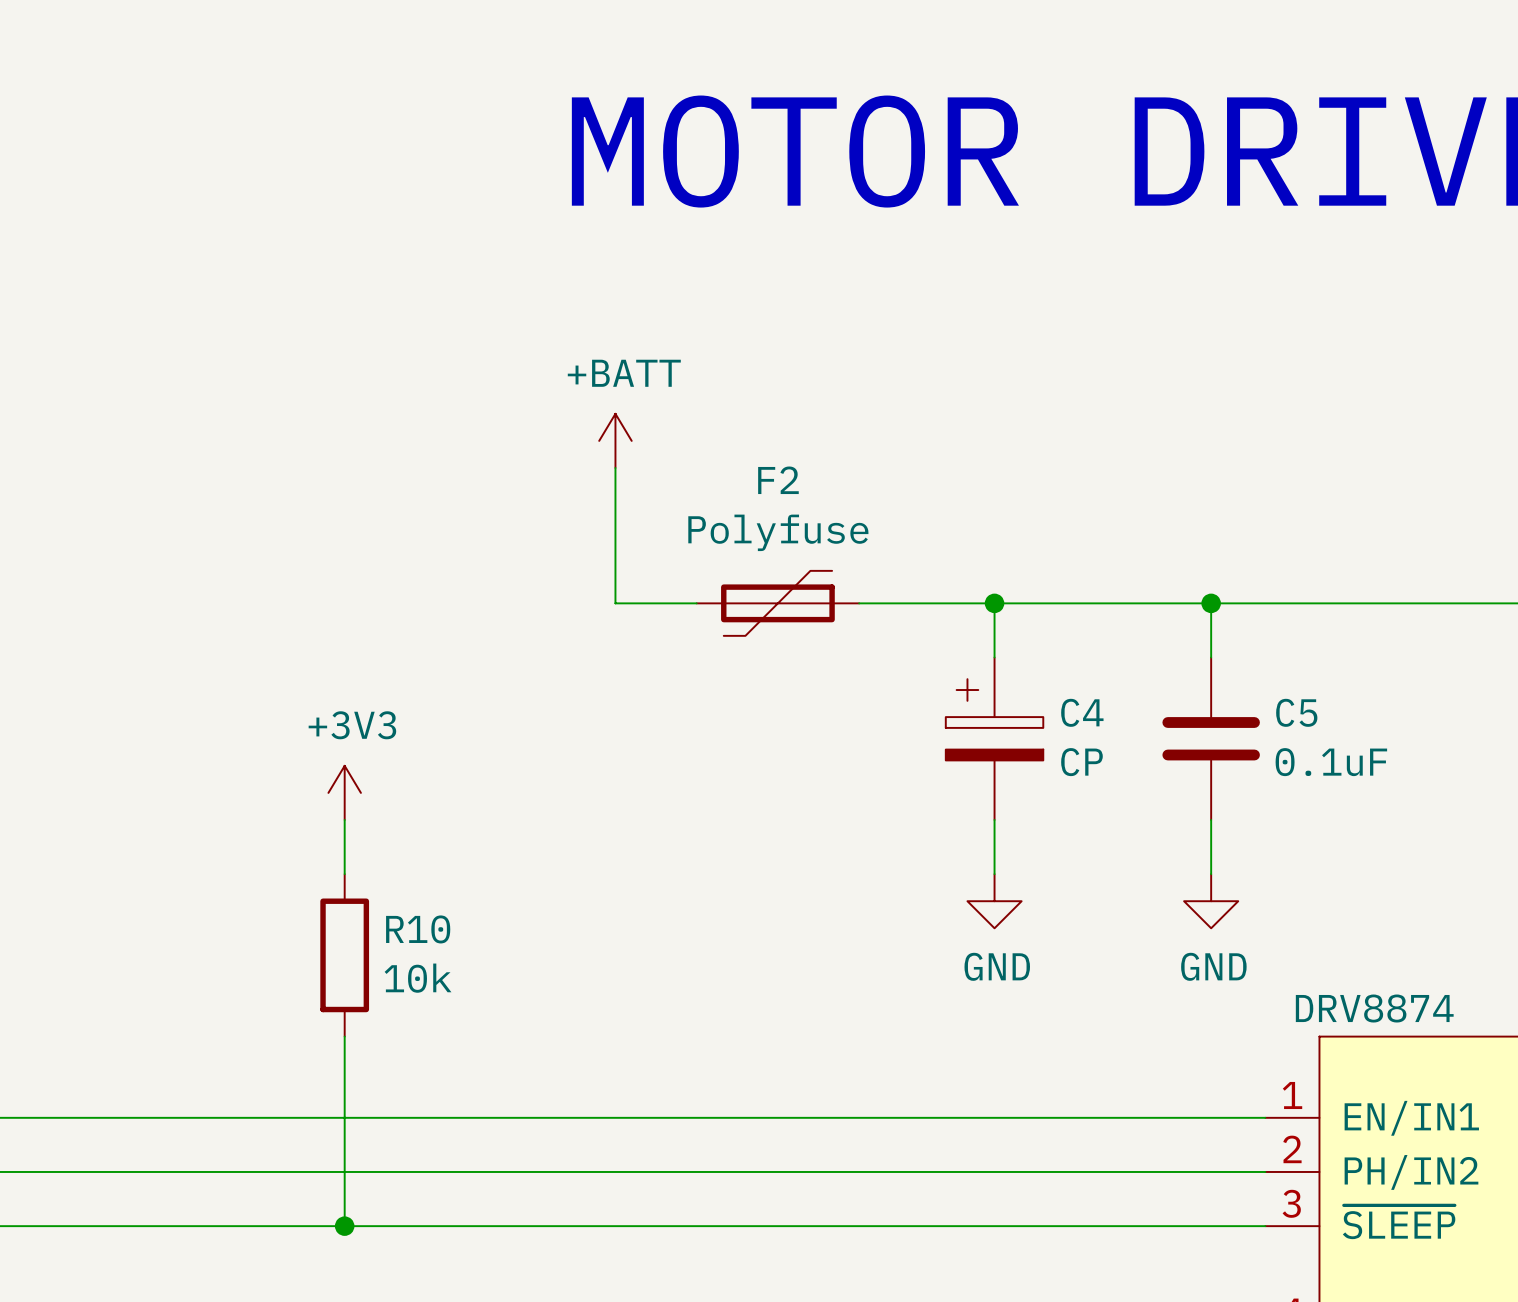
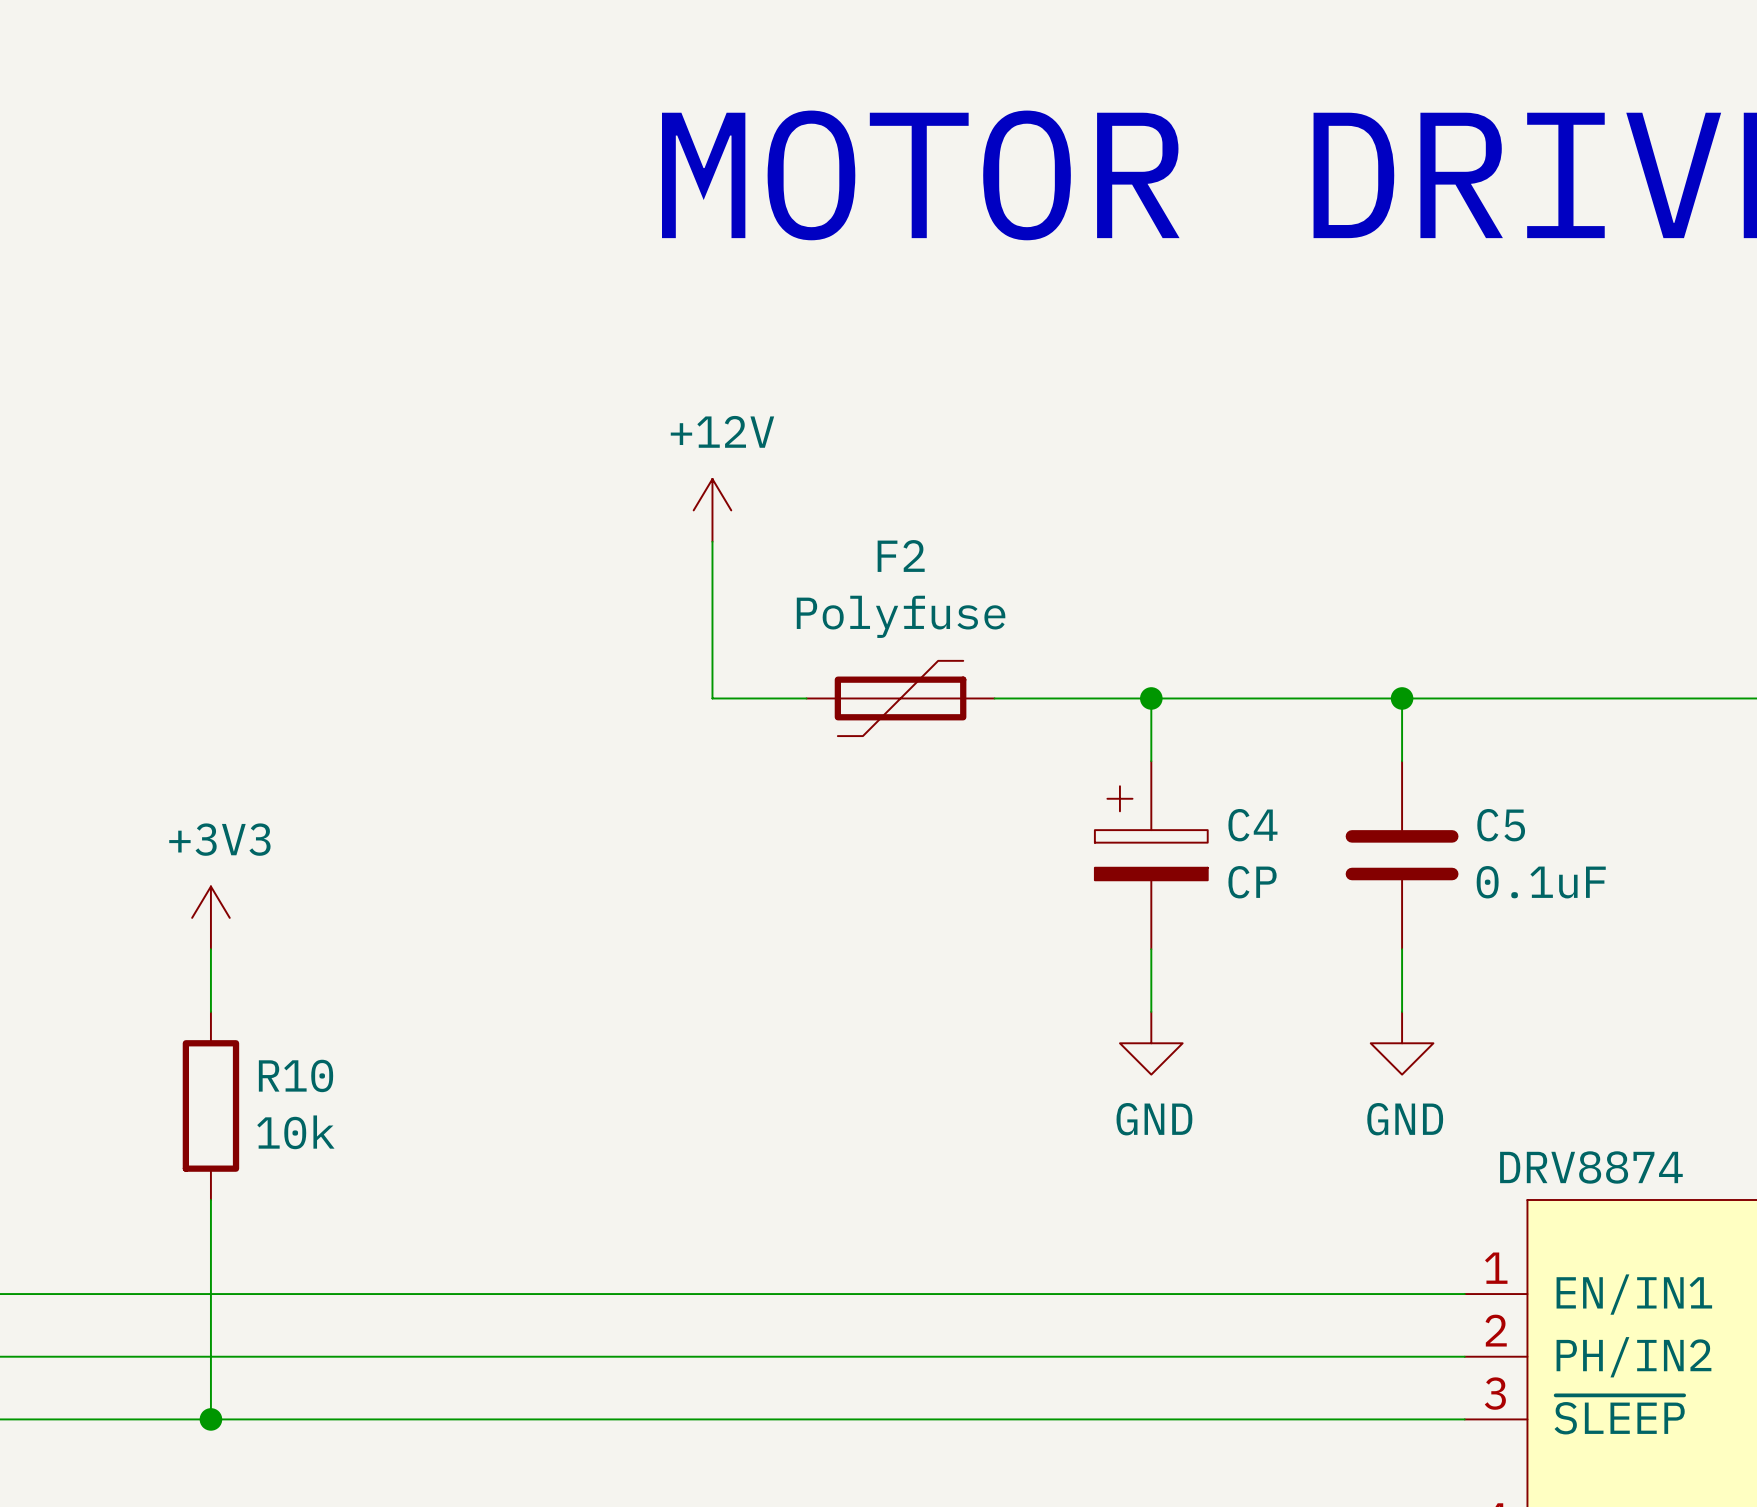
power symbol: +BATT (615, 440) -> +12V (712, 510)
power symbol position: +3V3 (344, 792) -> +3V3 (210, 917)
wire: (344, 819) (344, 874) -> (210, 949) (210, 1011)
R10 position: (344, 955) -> (210, 1105)
wire: (344, 1036) (344, 1226) -> (210, 1200) (210, 1419)
junction: none -> (210, 1419)
junction: (344, 1226) -> none

